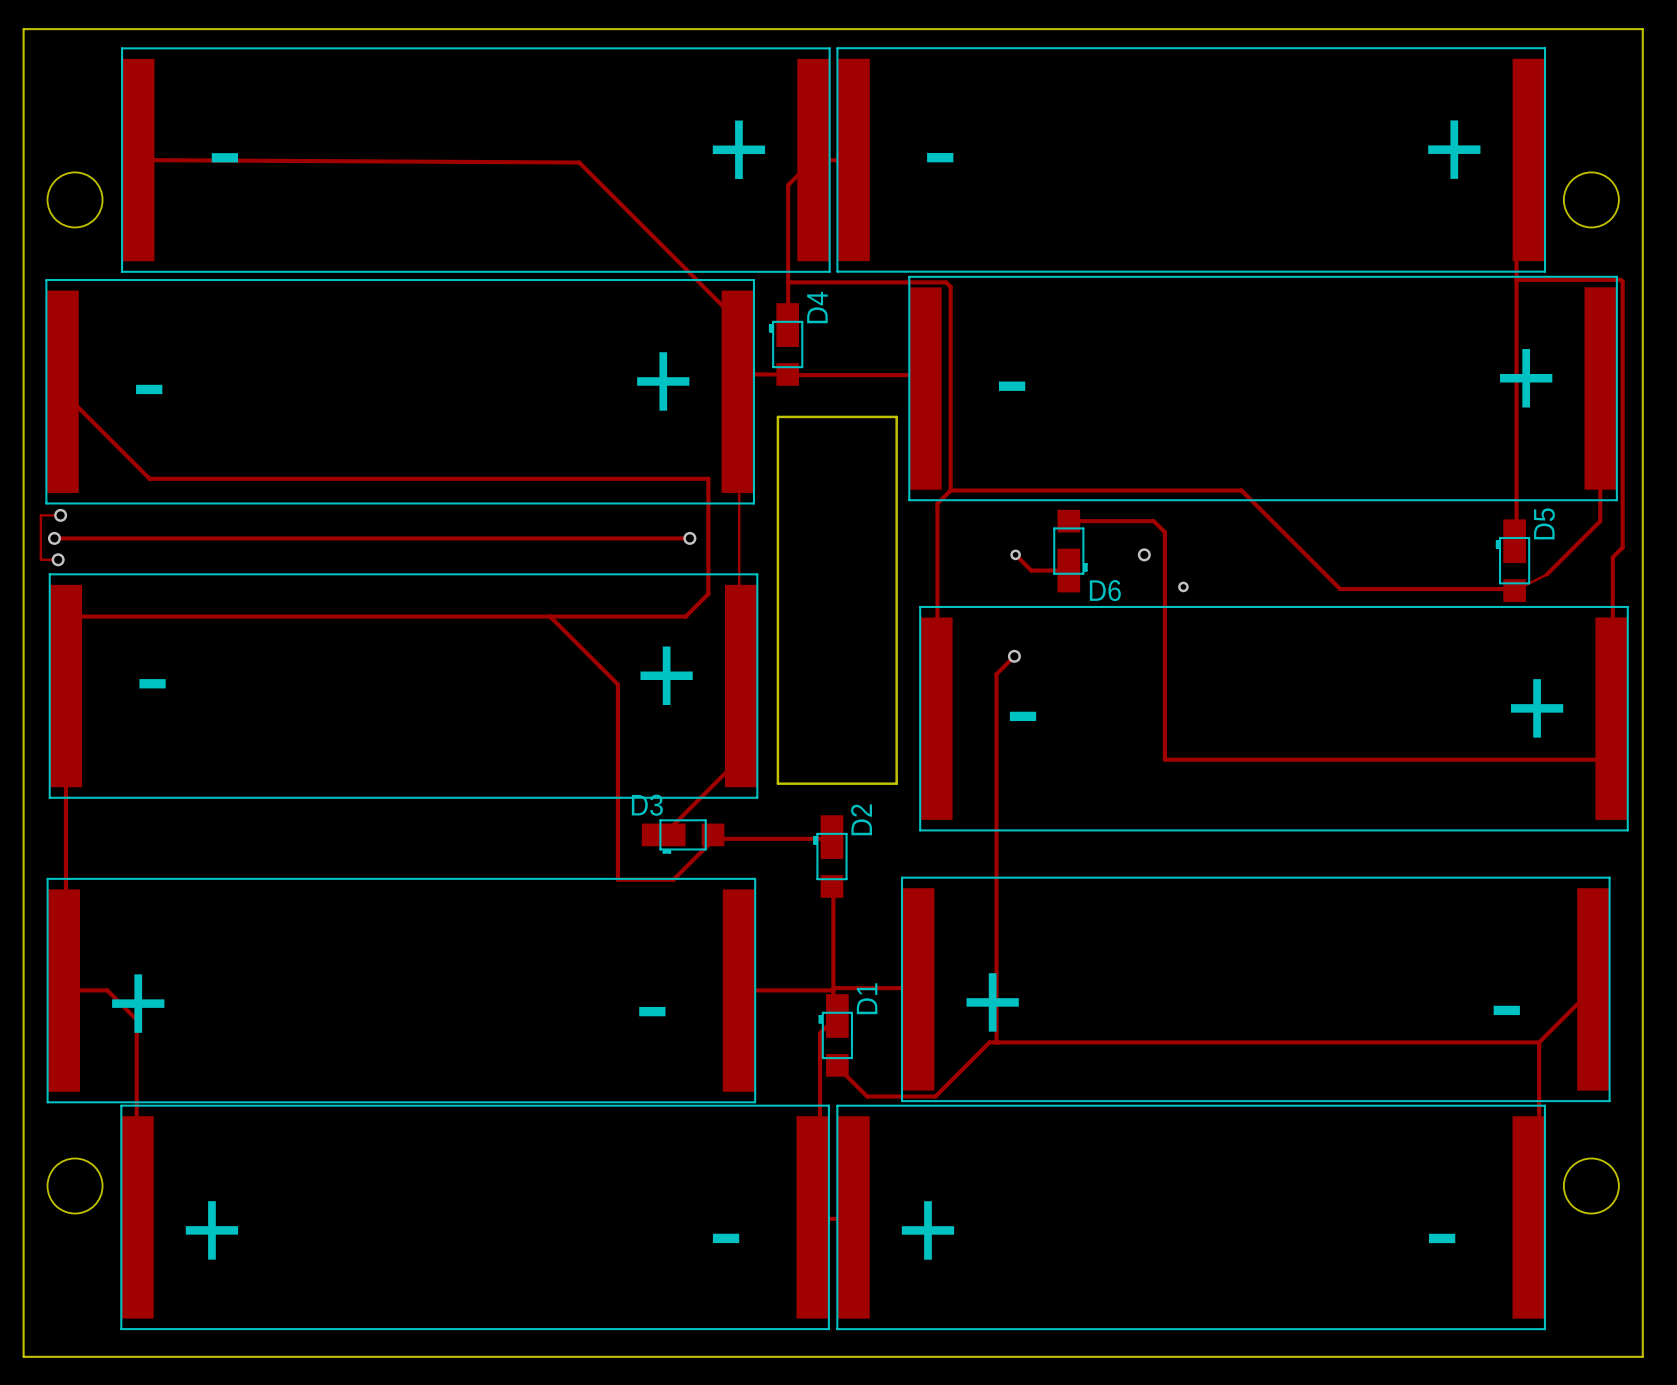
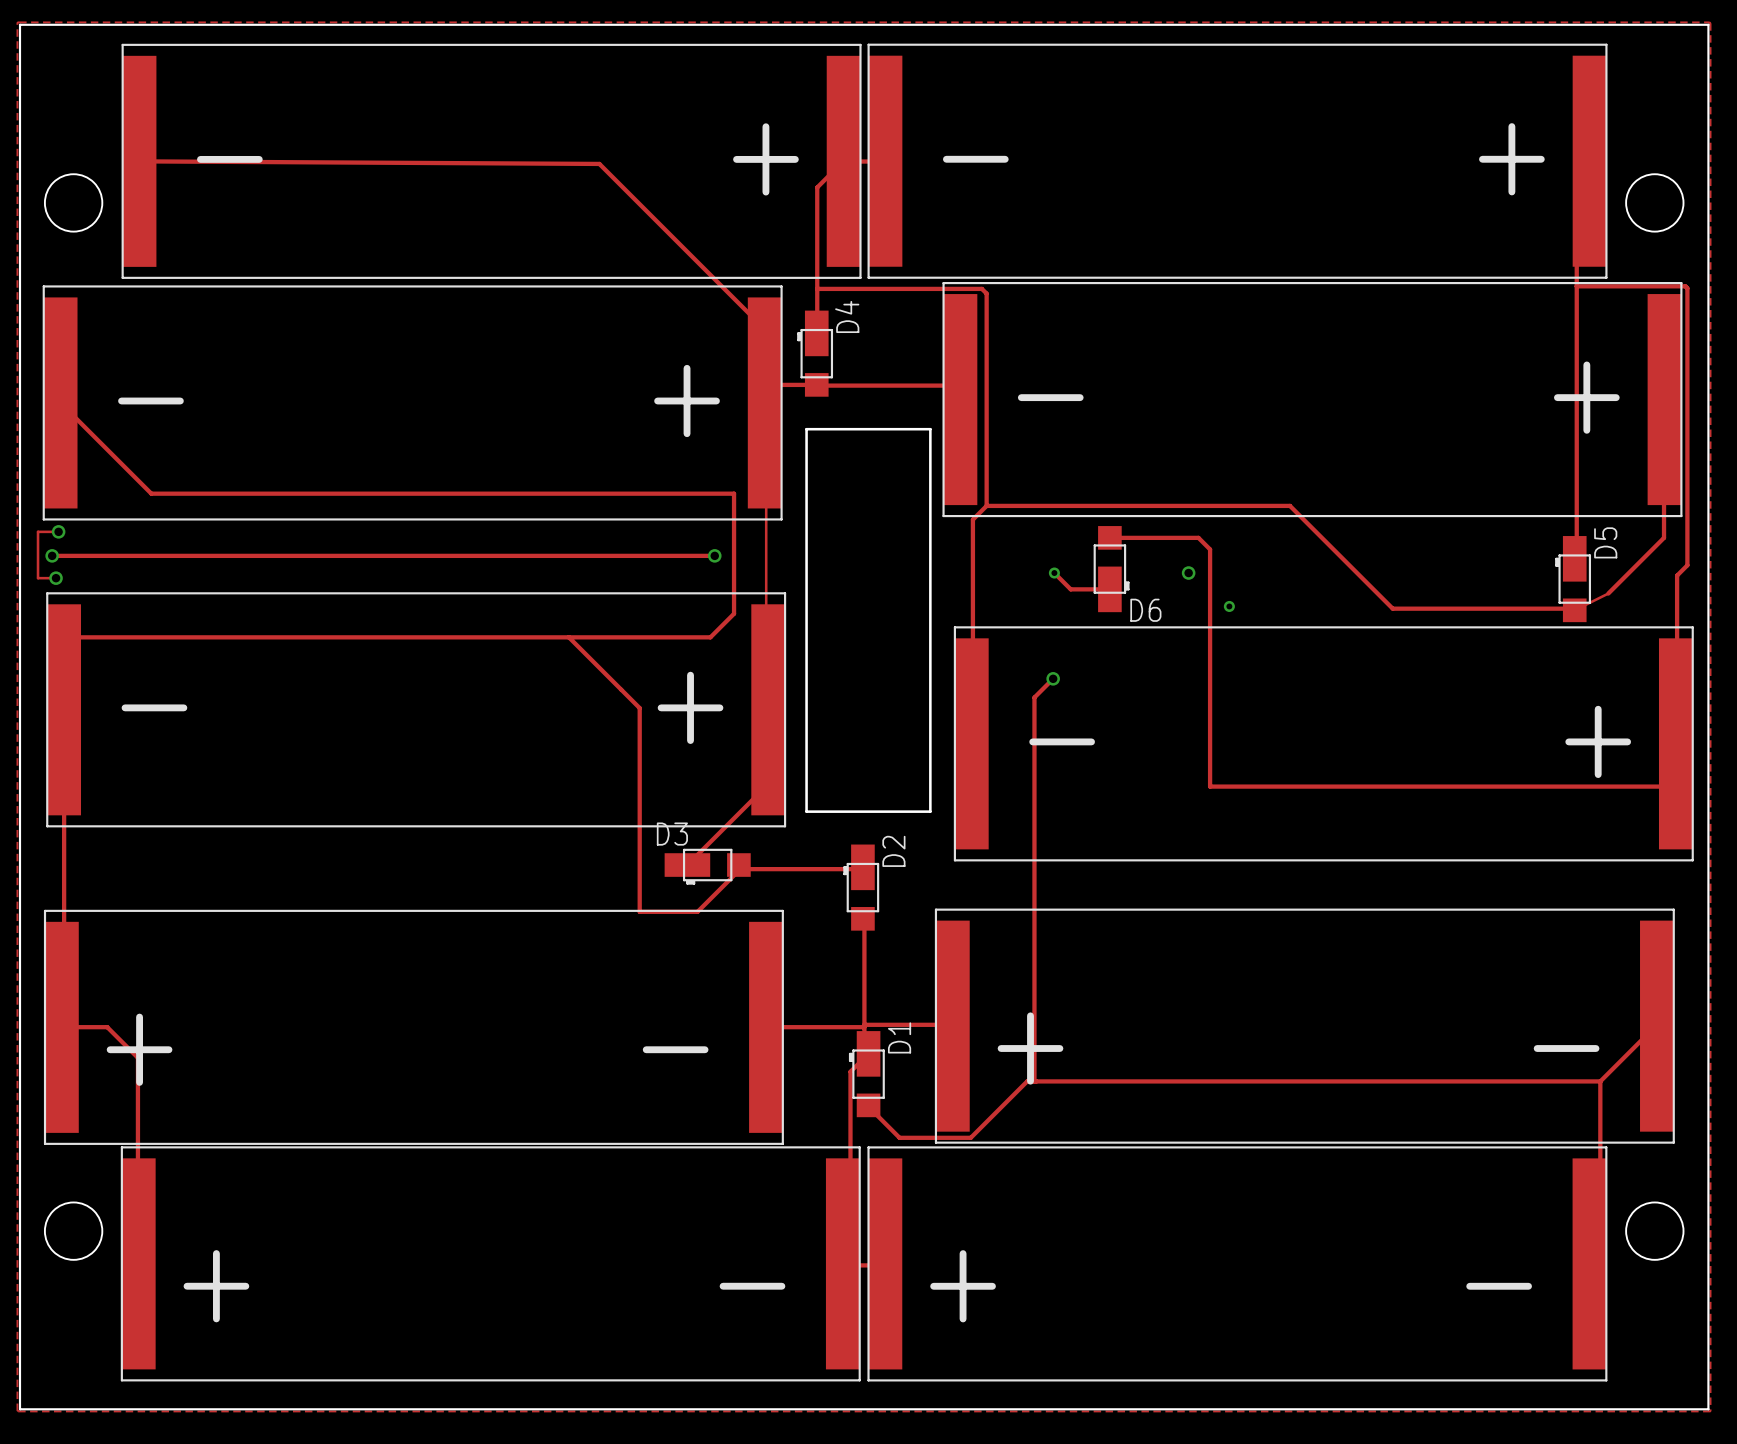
zone outline: none -> (17, 22) (1709, 22) (1710, 1411) (17, 1411) (17, 22)

